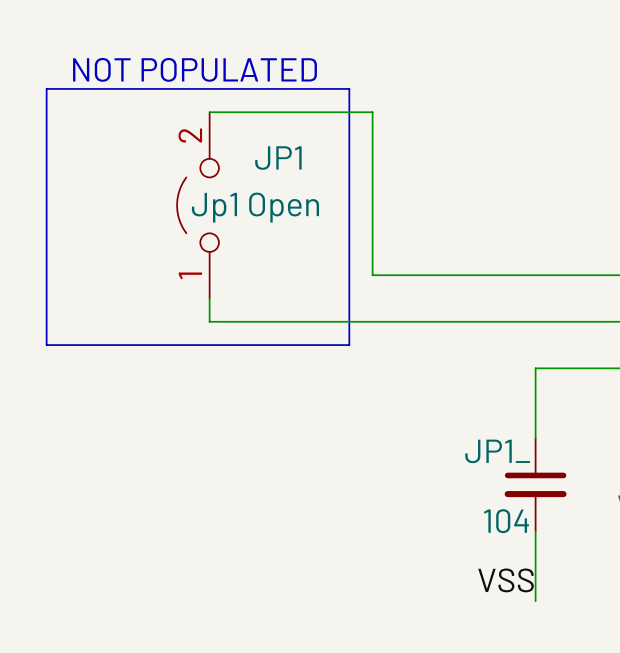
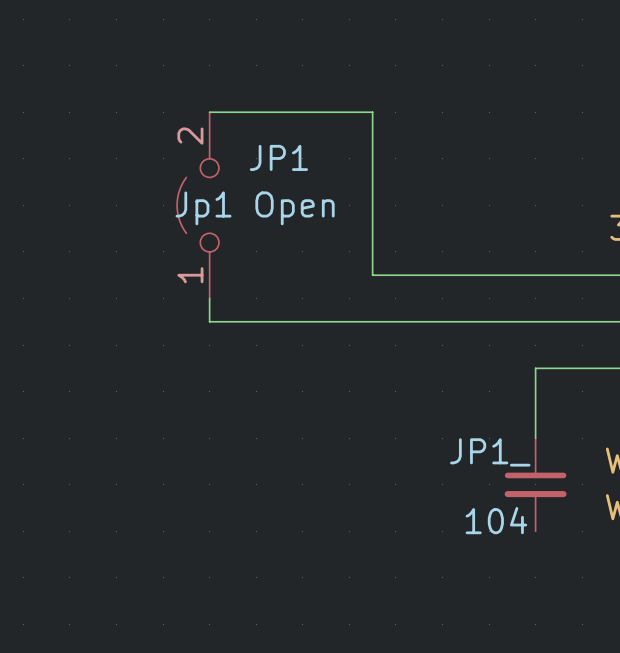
text: NOT POPULATED (194, 69) -> none
line: (46, 88) (46, 345) (349, 345) (349, 88) (46, 88) -> none
wire: (535, 531) (535, 601) -> none
label: VSS (506, 580) -> none

